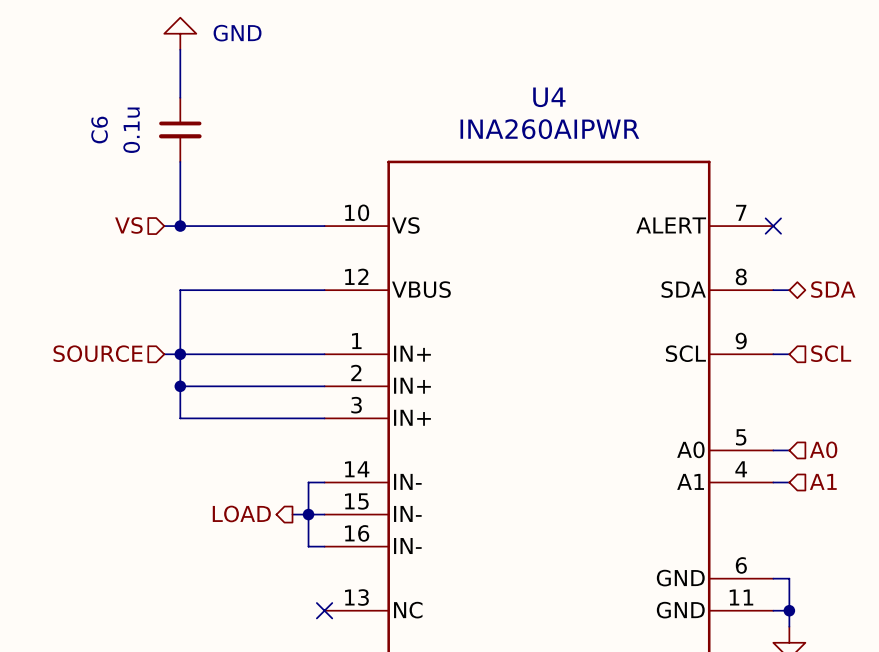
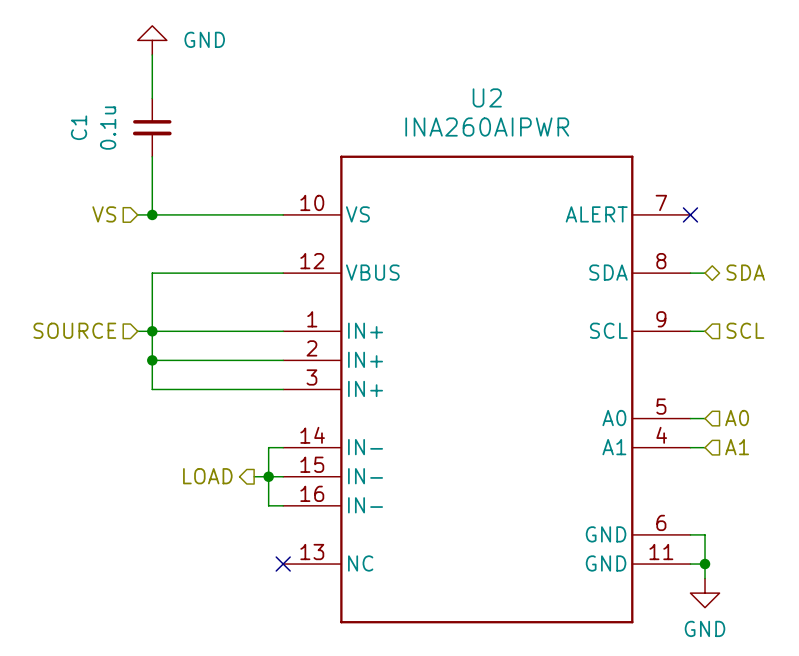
U4 name: U4 (549, 97) -> U2 (487, 97)
C6 name: C6 (99, 130) -> C1 (79, 127)

